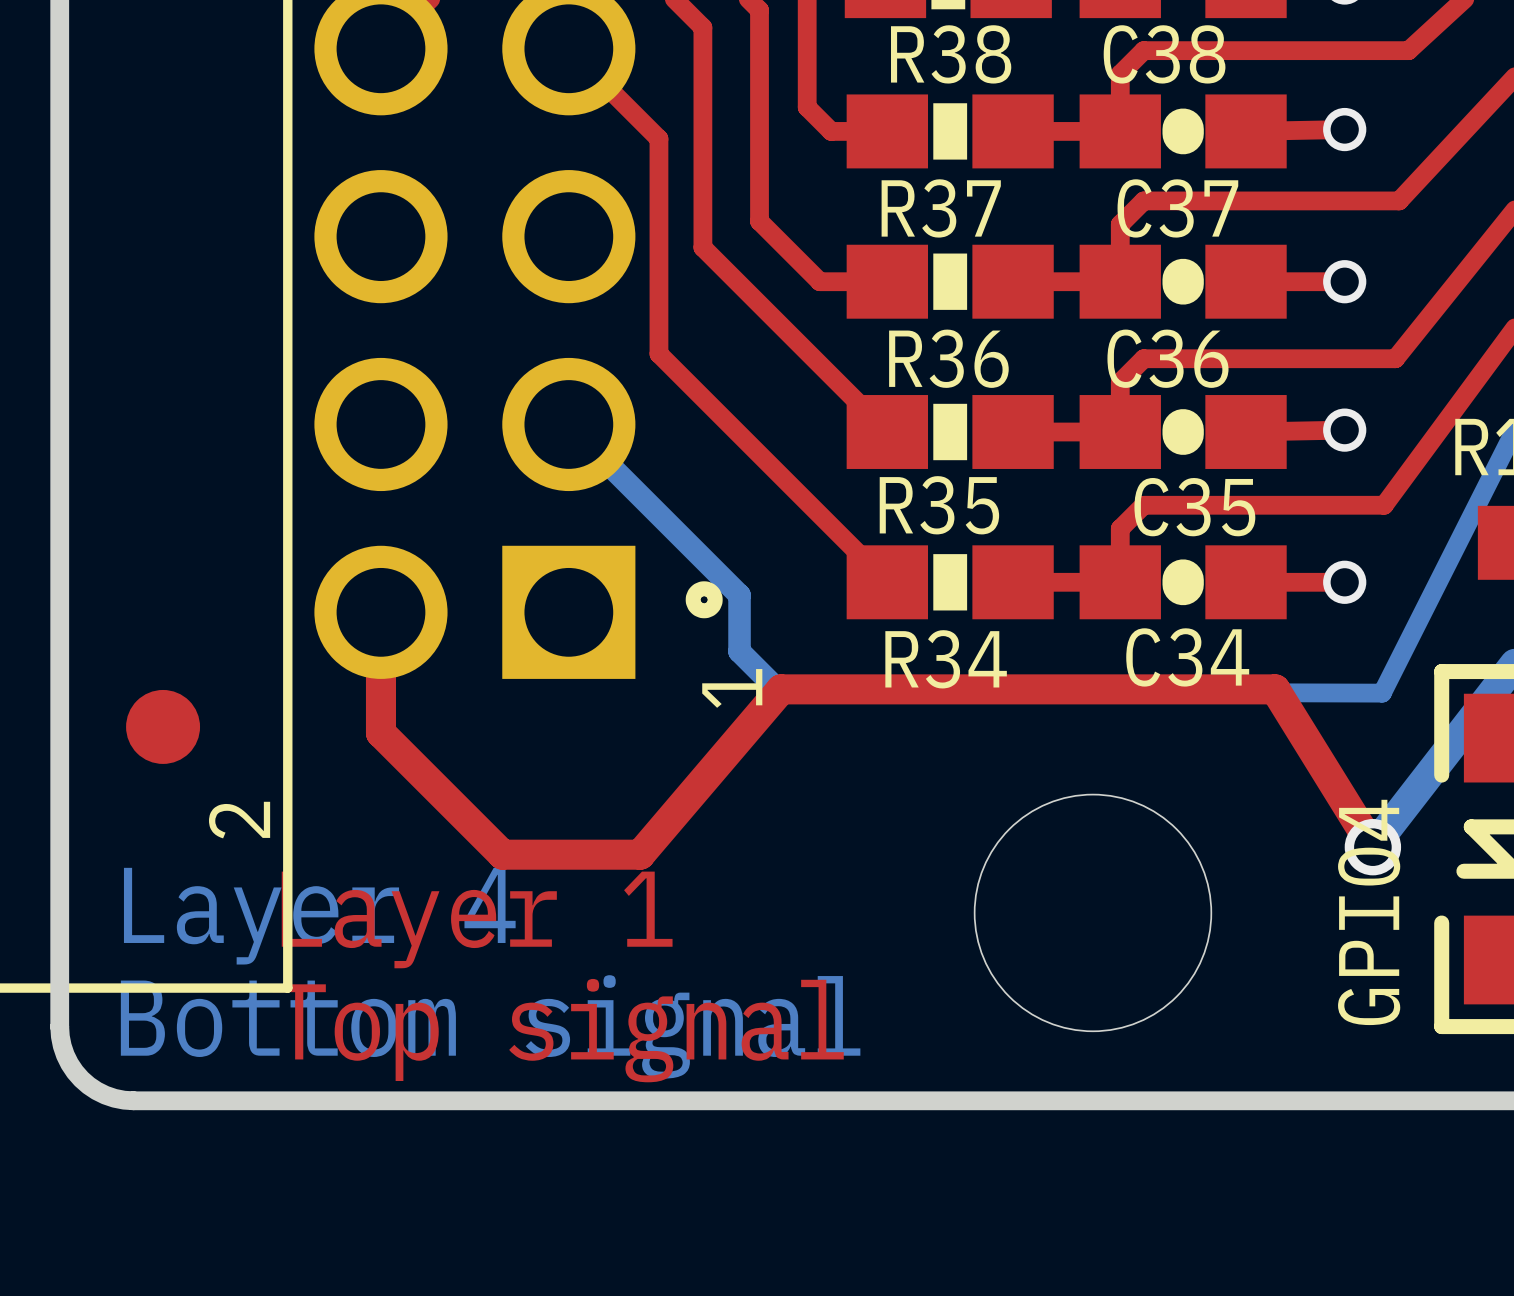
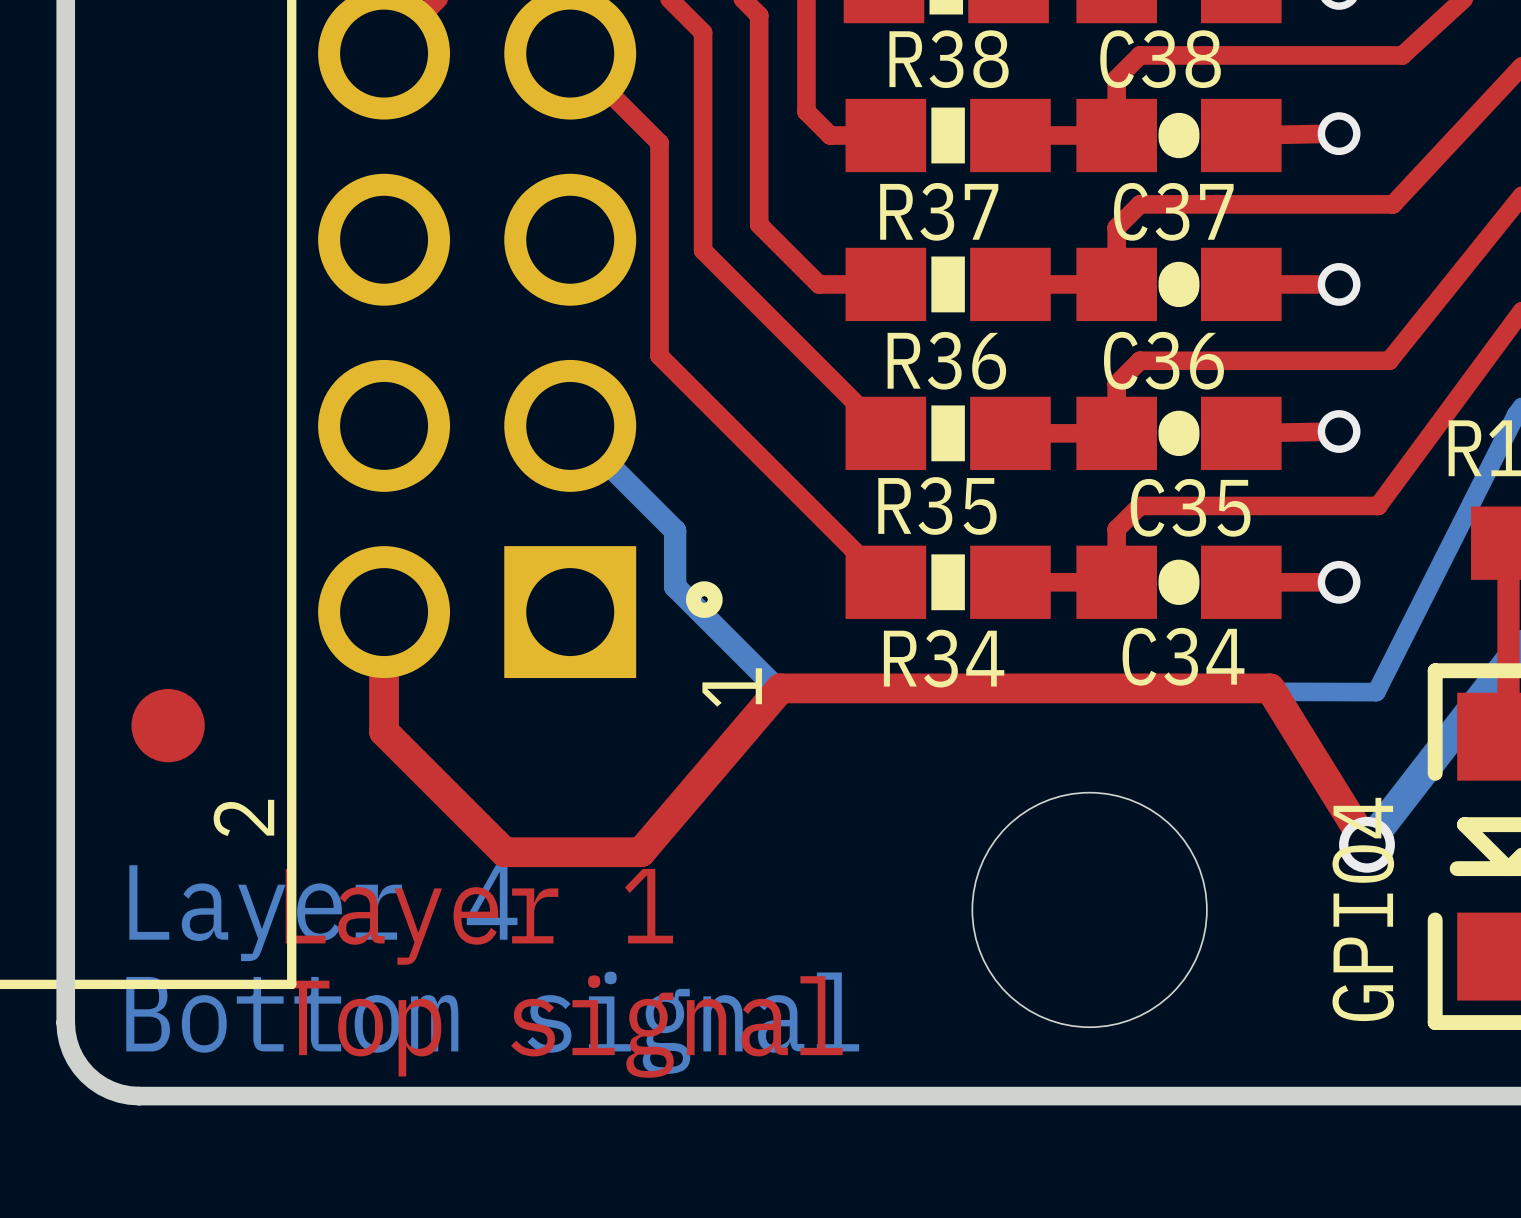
bottom track: (674, 530) (739, 595) (739, 651) -> (675, 530) (675, 586) (739, 650)

